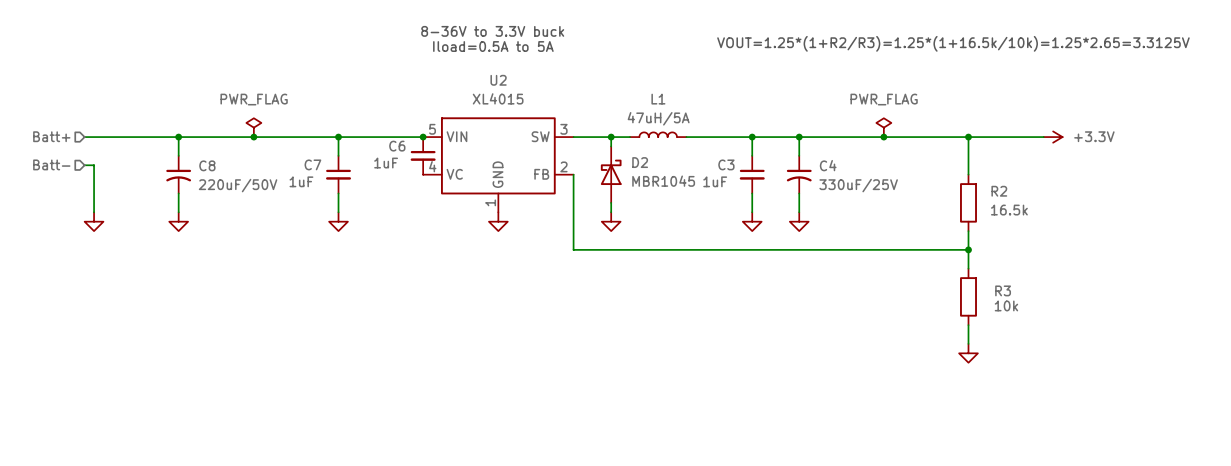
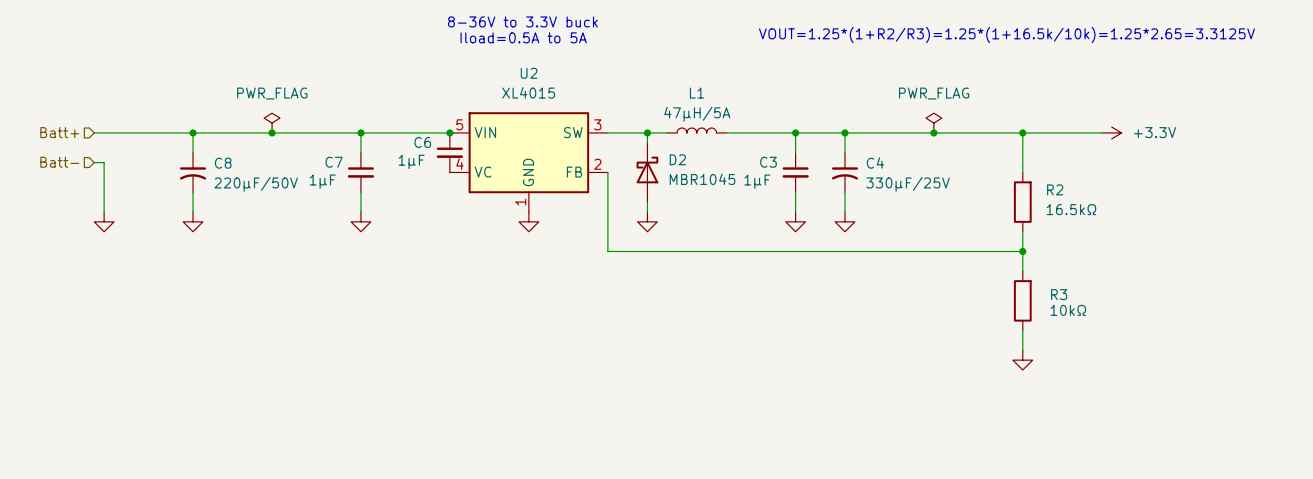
L1 value: 47uH/5A (658, 118) -> 47µH/5A (697, 114)
C6 value: 1uF (386, 163) -> 1µF (411, 161)
C7 value: 1uF (301, 181) -> 1µF (322, 181)
C3 value: 1uF (715, 181) -> 1µF (757, 181)
C8 value: 220uF/50V (238, 185) -> 220µF/50V (256, 184)
C4 value: 330uF/25V (858, 185) -> 330µF/25V (908, 184)
R2 value: 16.5k (1009, 210) -> 16.5kΩ (1071, 209)
R3 value: 10k (1006, 305) -> 10kΩ (1068, 310)

